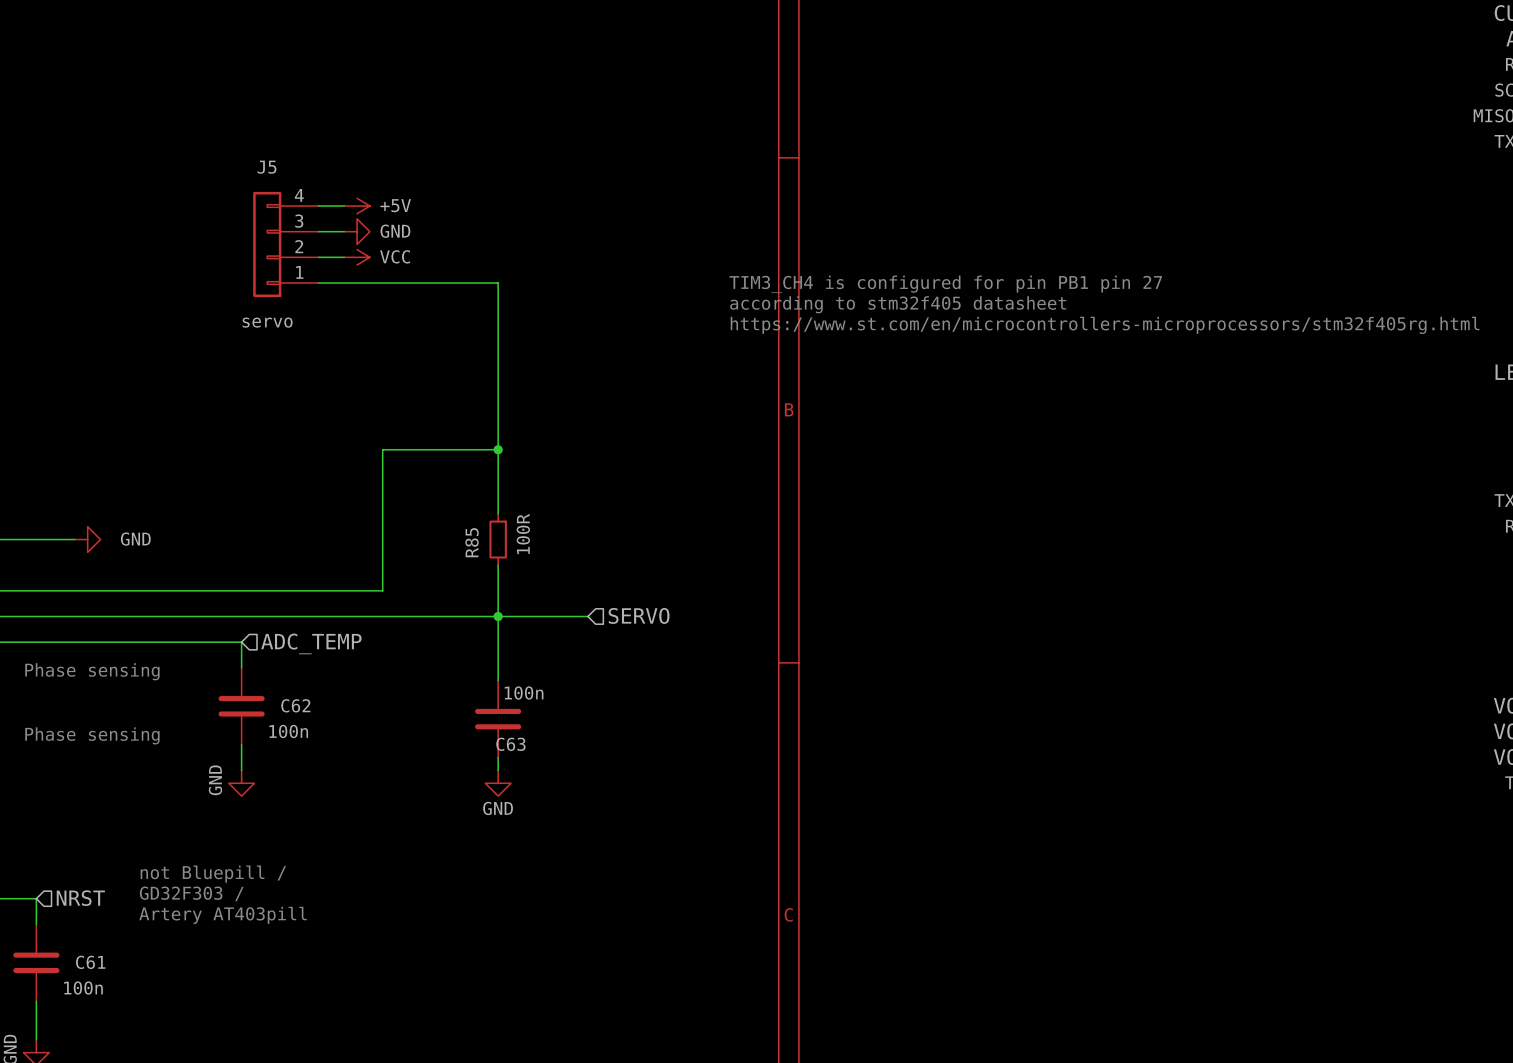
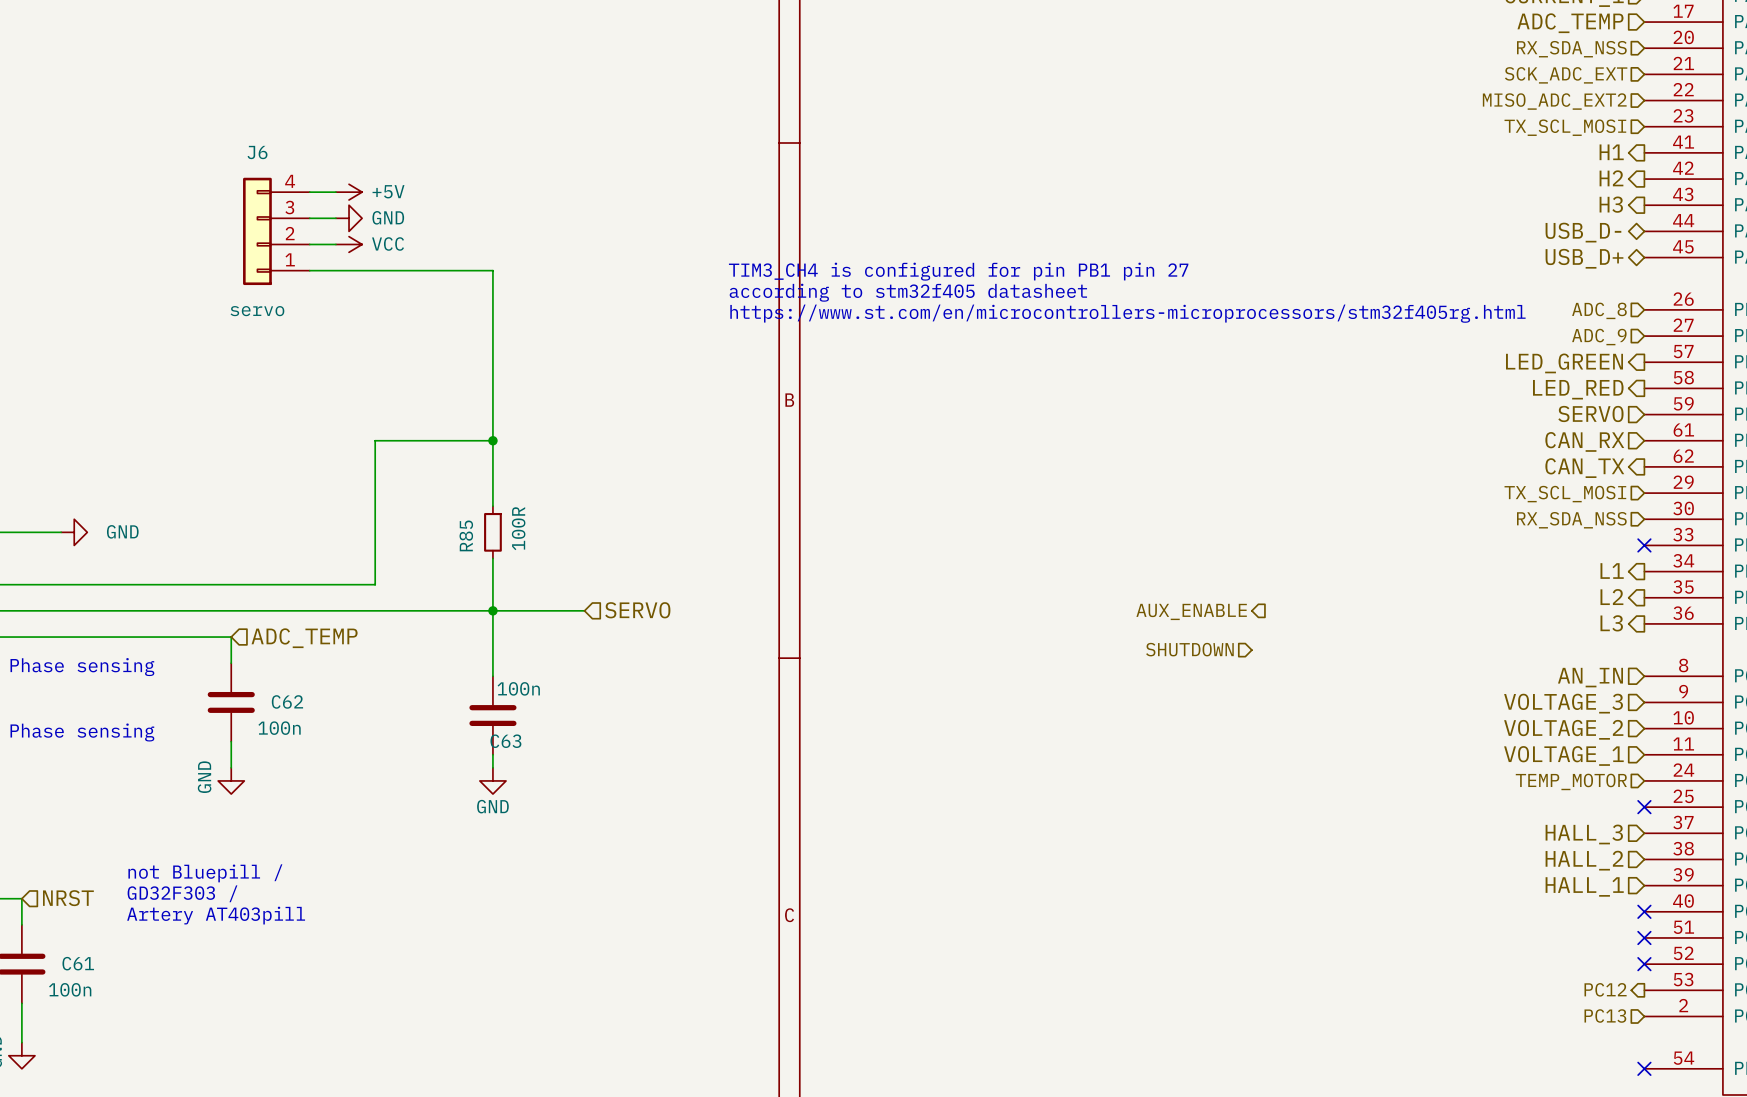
J5 name: J5 (267, 167) -> J6 (257, 152)
hierarchical label: none -> AUX_ENABLE (1191, 611)
hierarchical label: none -> SHUTDOWN (1189, 649)

